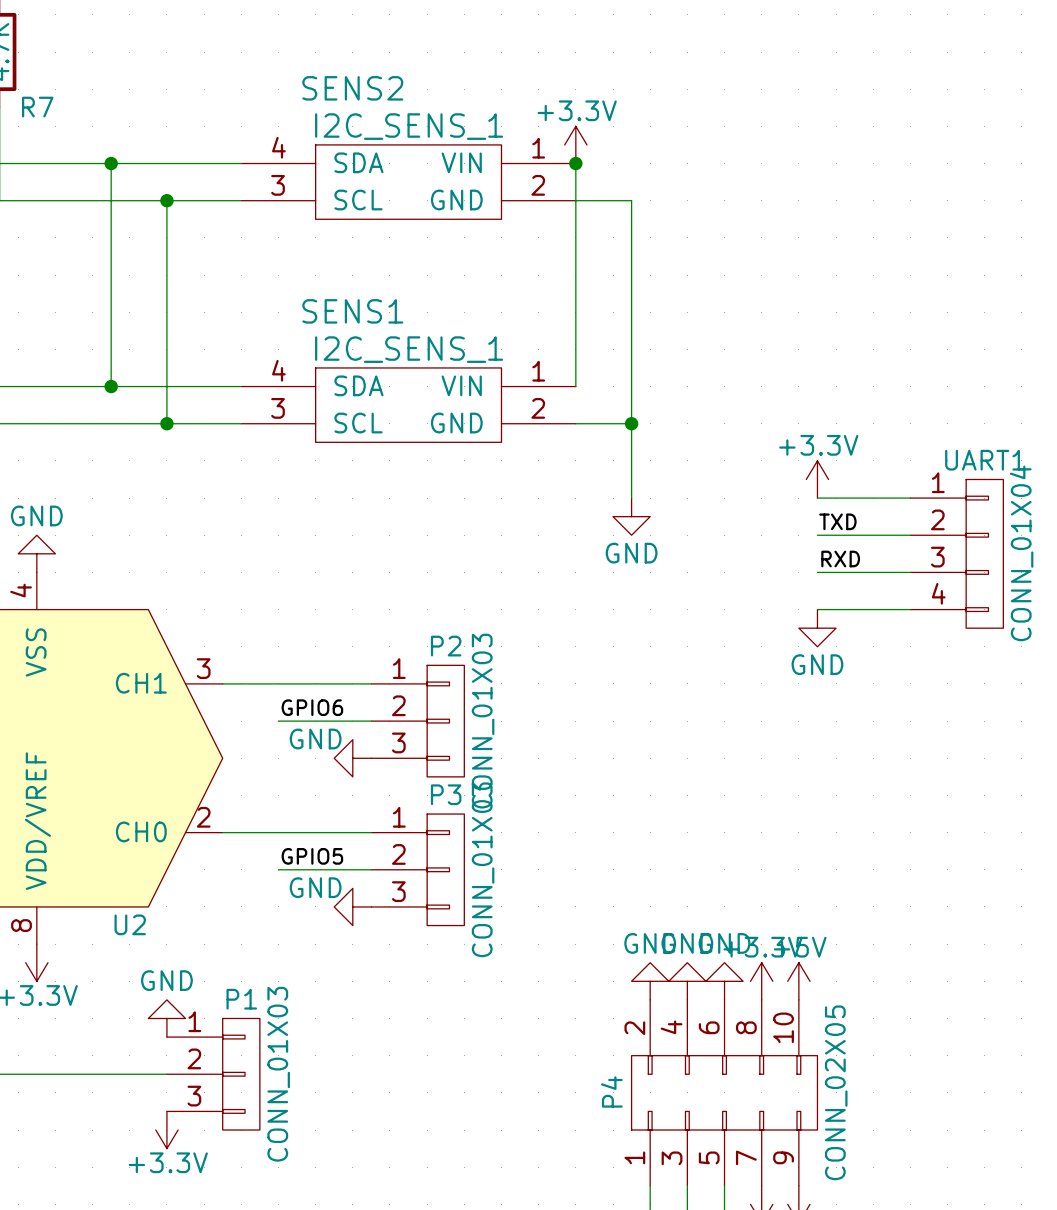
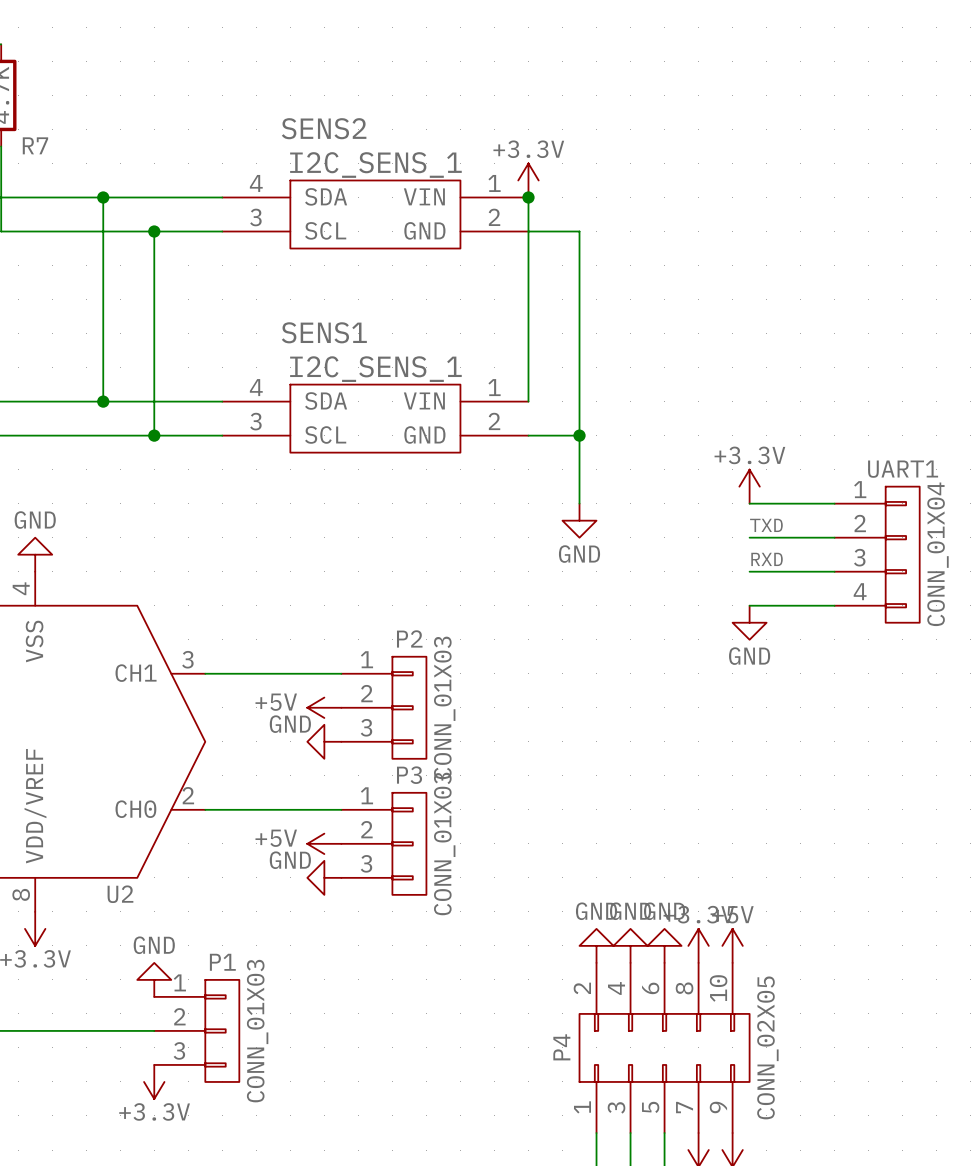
label: GPIO6 (312, 707) -> none
wire: (278, 721) (371, 721) -> none
power symbol: none -> +5V (324, 707)
label: GPIO5 (312, 856) -> none
wire: (278, 869) (371, 869) -> none
power symbol: none -> +5V (324, 843)

